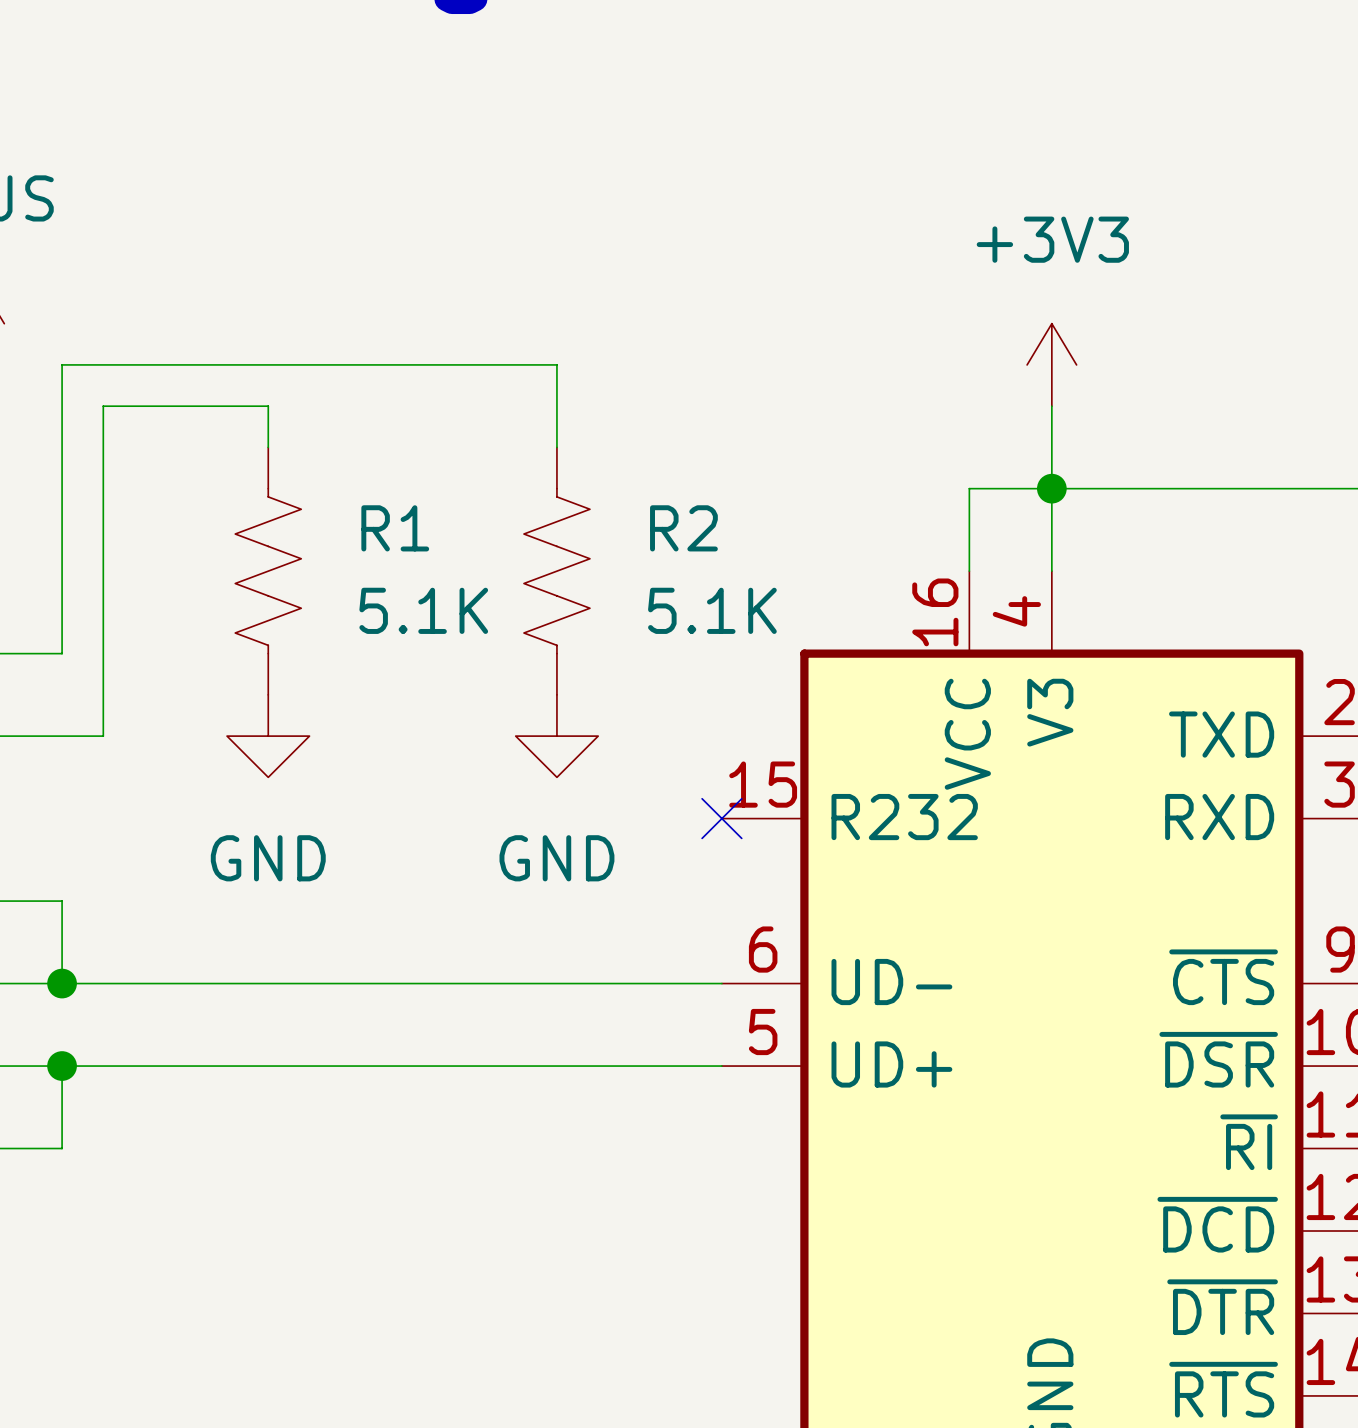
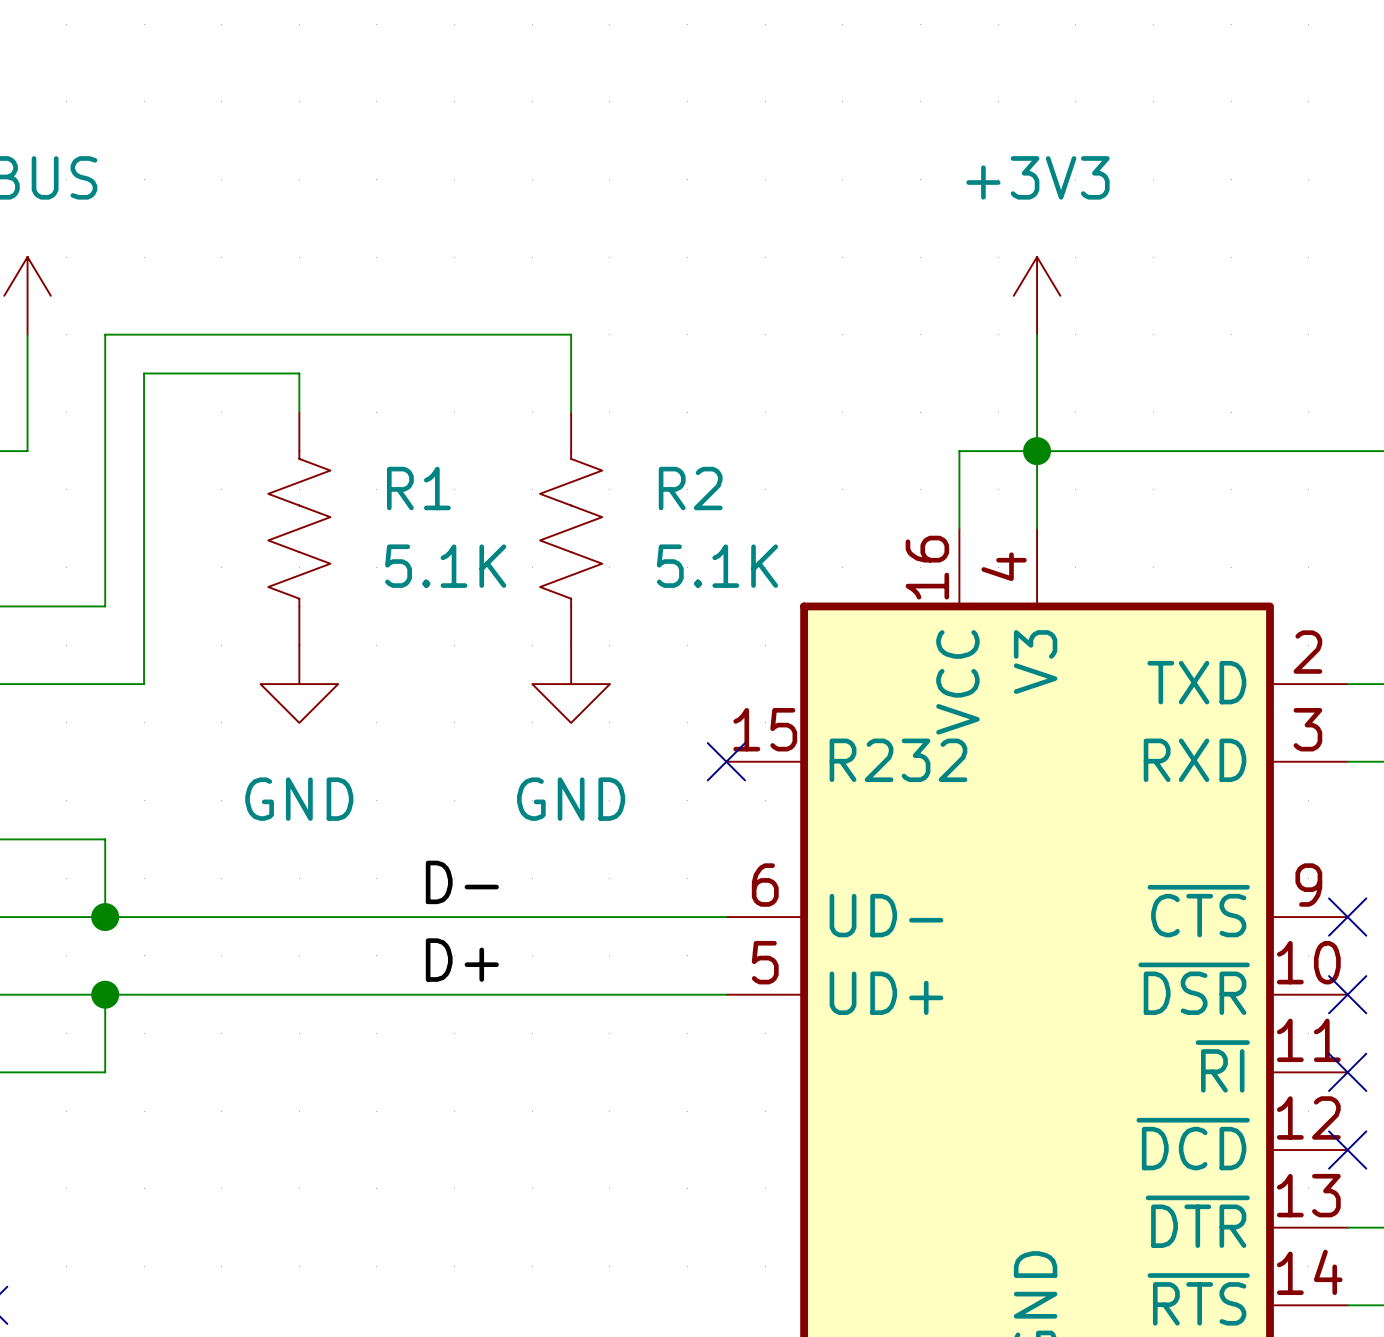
power symbol position: +3V3 (1051, 364) -> +3V3 (1037, 295)
label: none -> D- (462, 882)
label: none -> D+ (462, 960)

